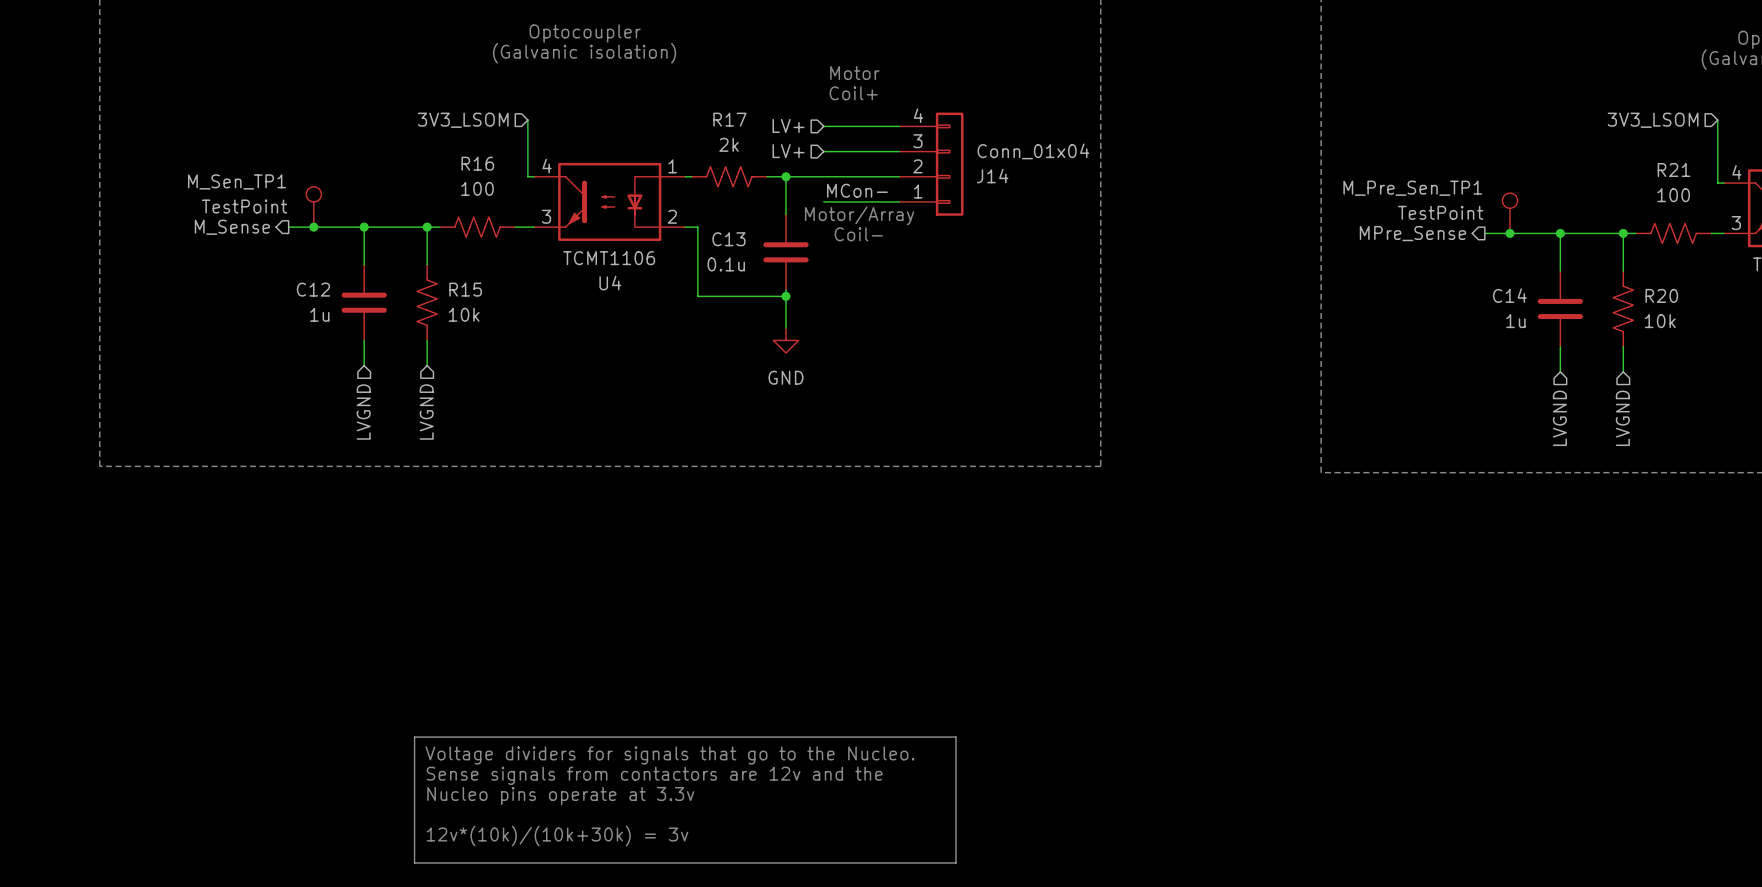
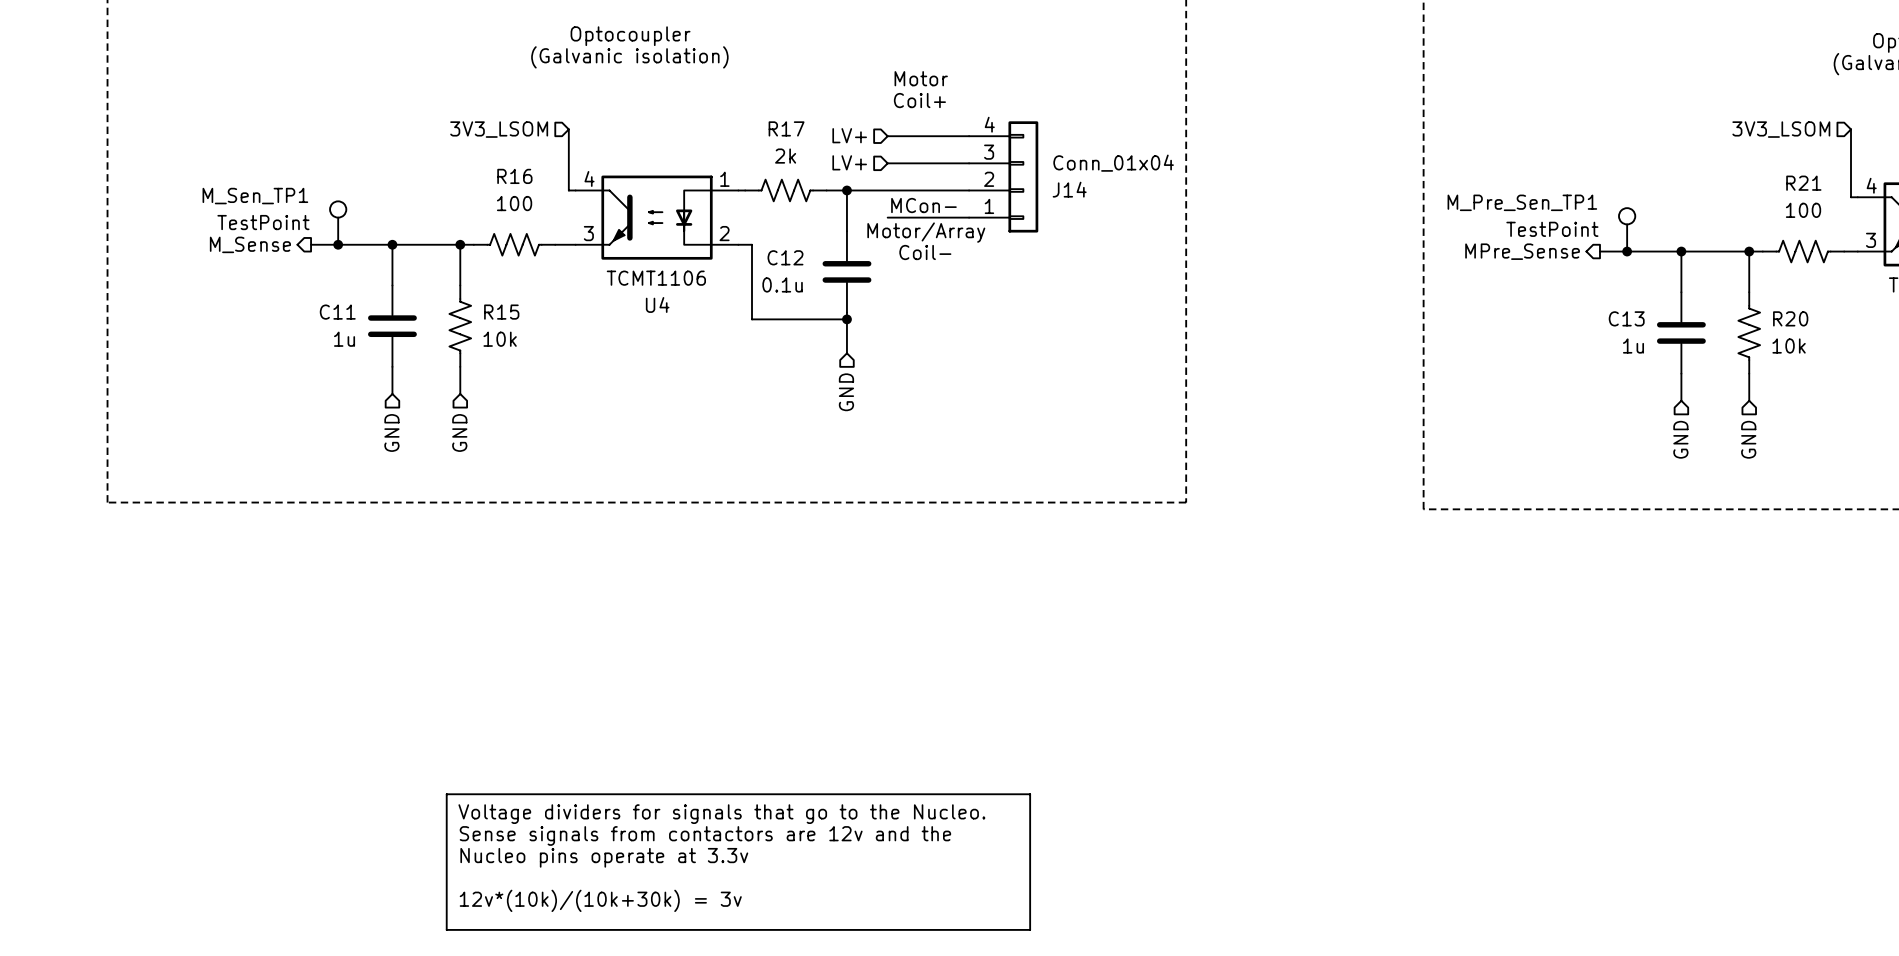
C13 name: C13 (728, 239) -> C12 (785, 257)
C12 name: C12 (313, 289) -> C11 (337, 312)
C14 name: C14 (1509, 295) -> C13 (1626, 318)
power symbol: GND (786, 340) -> none
hierarchical label: none -> GND (846, 392)
hierarchical label: LVGND (363, 412) -> GND (391, 432)
hierarchical label: LVGND (426, 412) -> GND (459, 432)
hierarchical label: LVGND (1559, 418) -> GND (1680, 439)
hierarchical label: LVGND (1622, 418) -> GND (1748, 439)

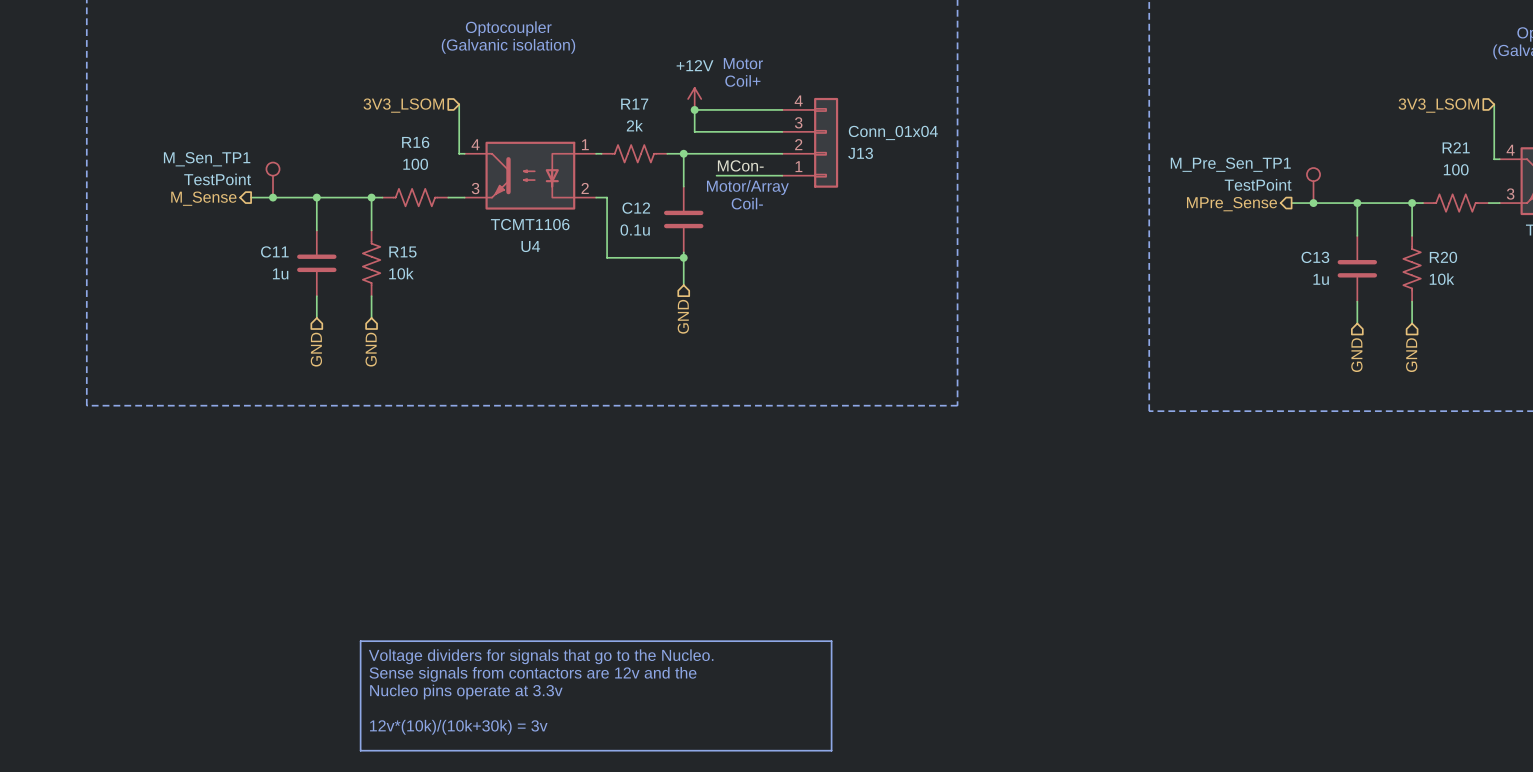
power symbol: none -> +12V (694, 99)
hierarchical label: LV+ (849, 135) -> none
junction: none -> (694, 109)
wire: none -> (716, 109) (694, 109) (694, 131) (716, 131)
hierarchical label: LV+ (849, 162) -> none
J14 name: J14 (1069, 189) -> J13 (860, 153)

